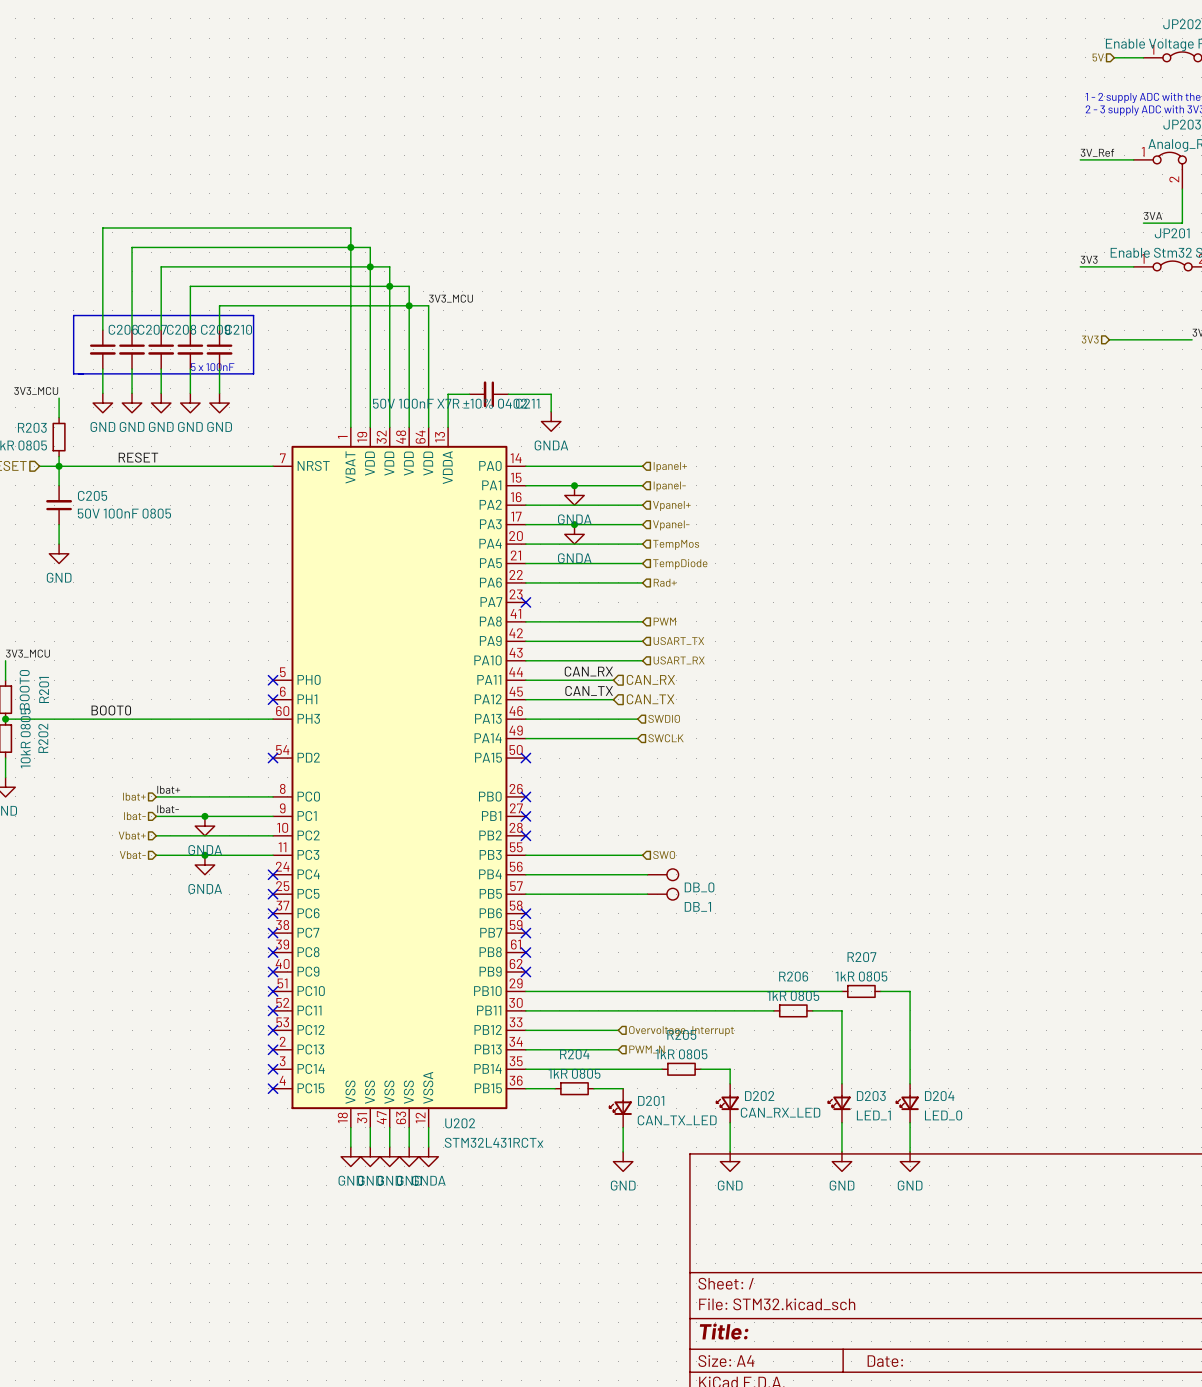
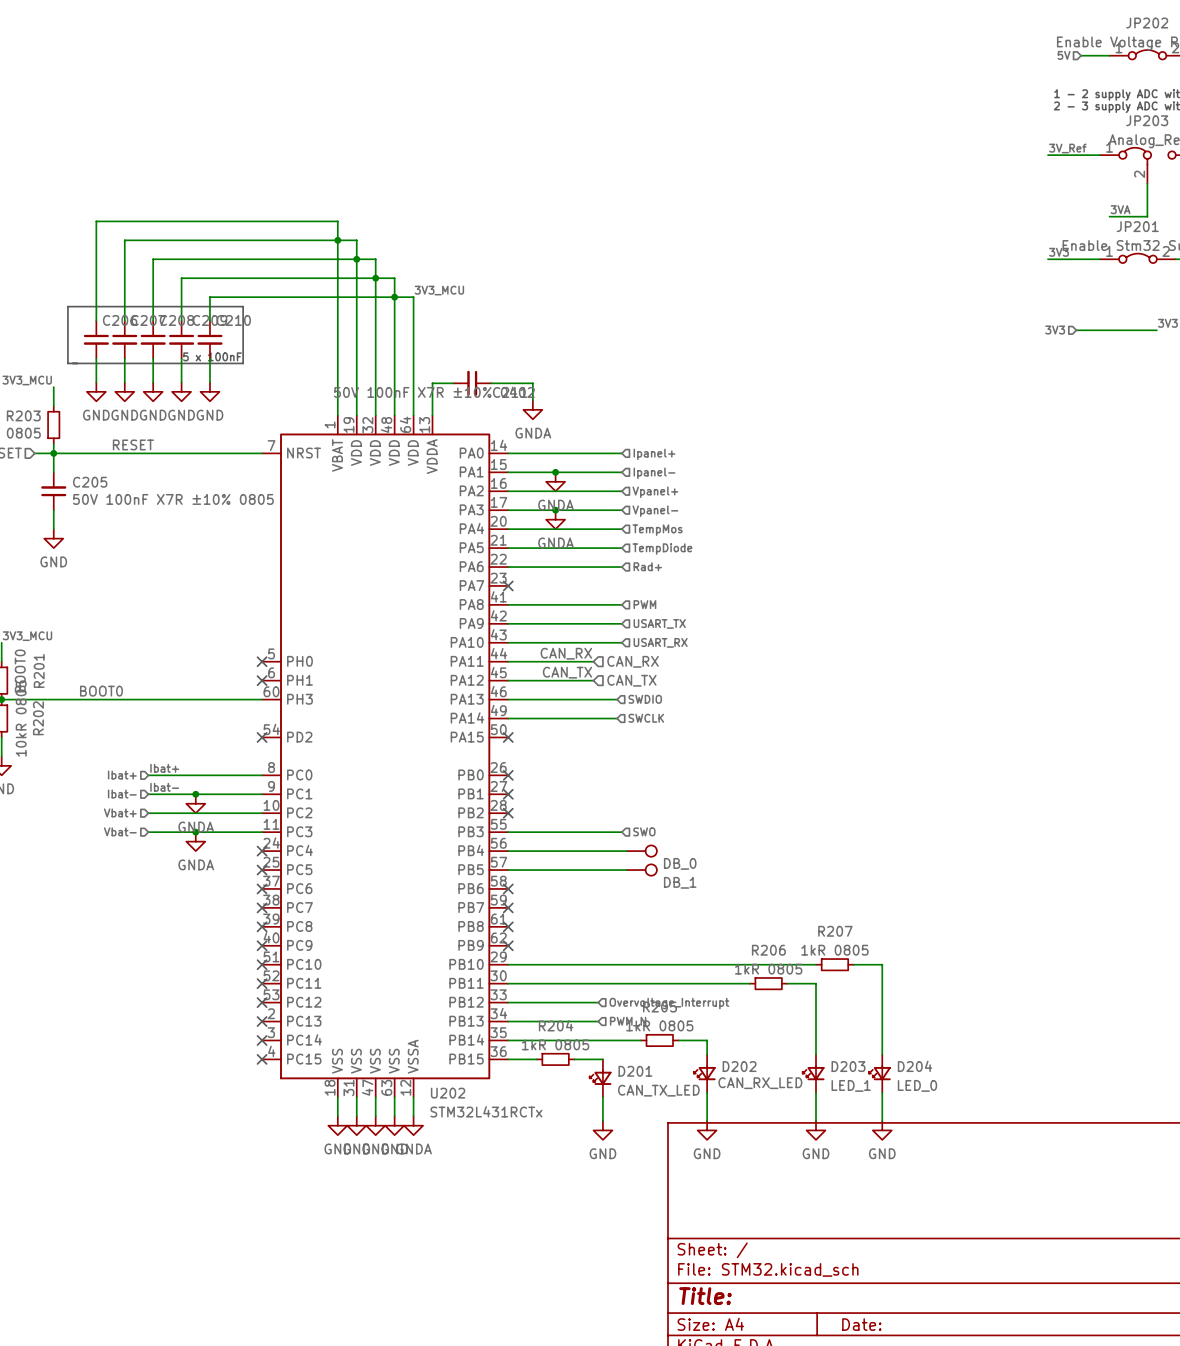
C205 value: 50V 100nF 0805 (124, 513) -> 50V 100nF X7R ±10% 0805 (173, 499)

